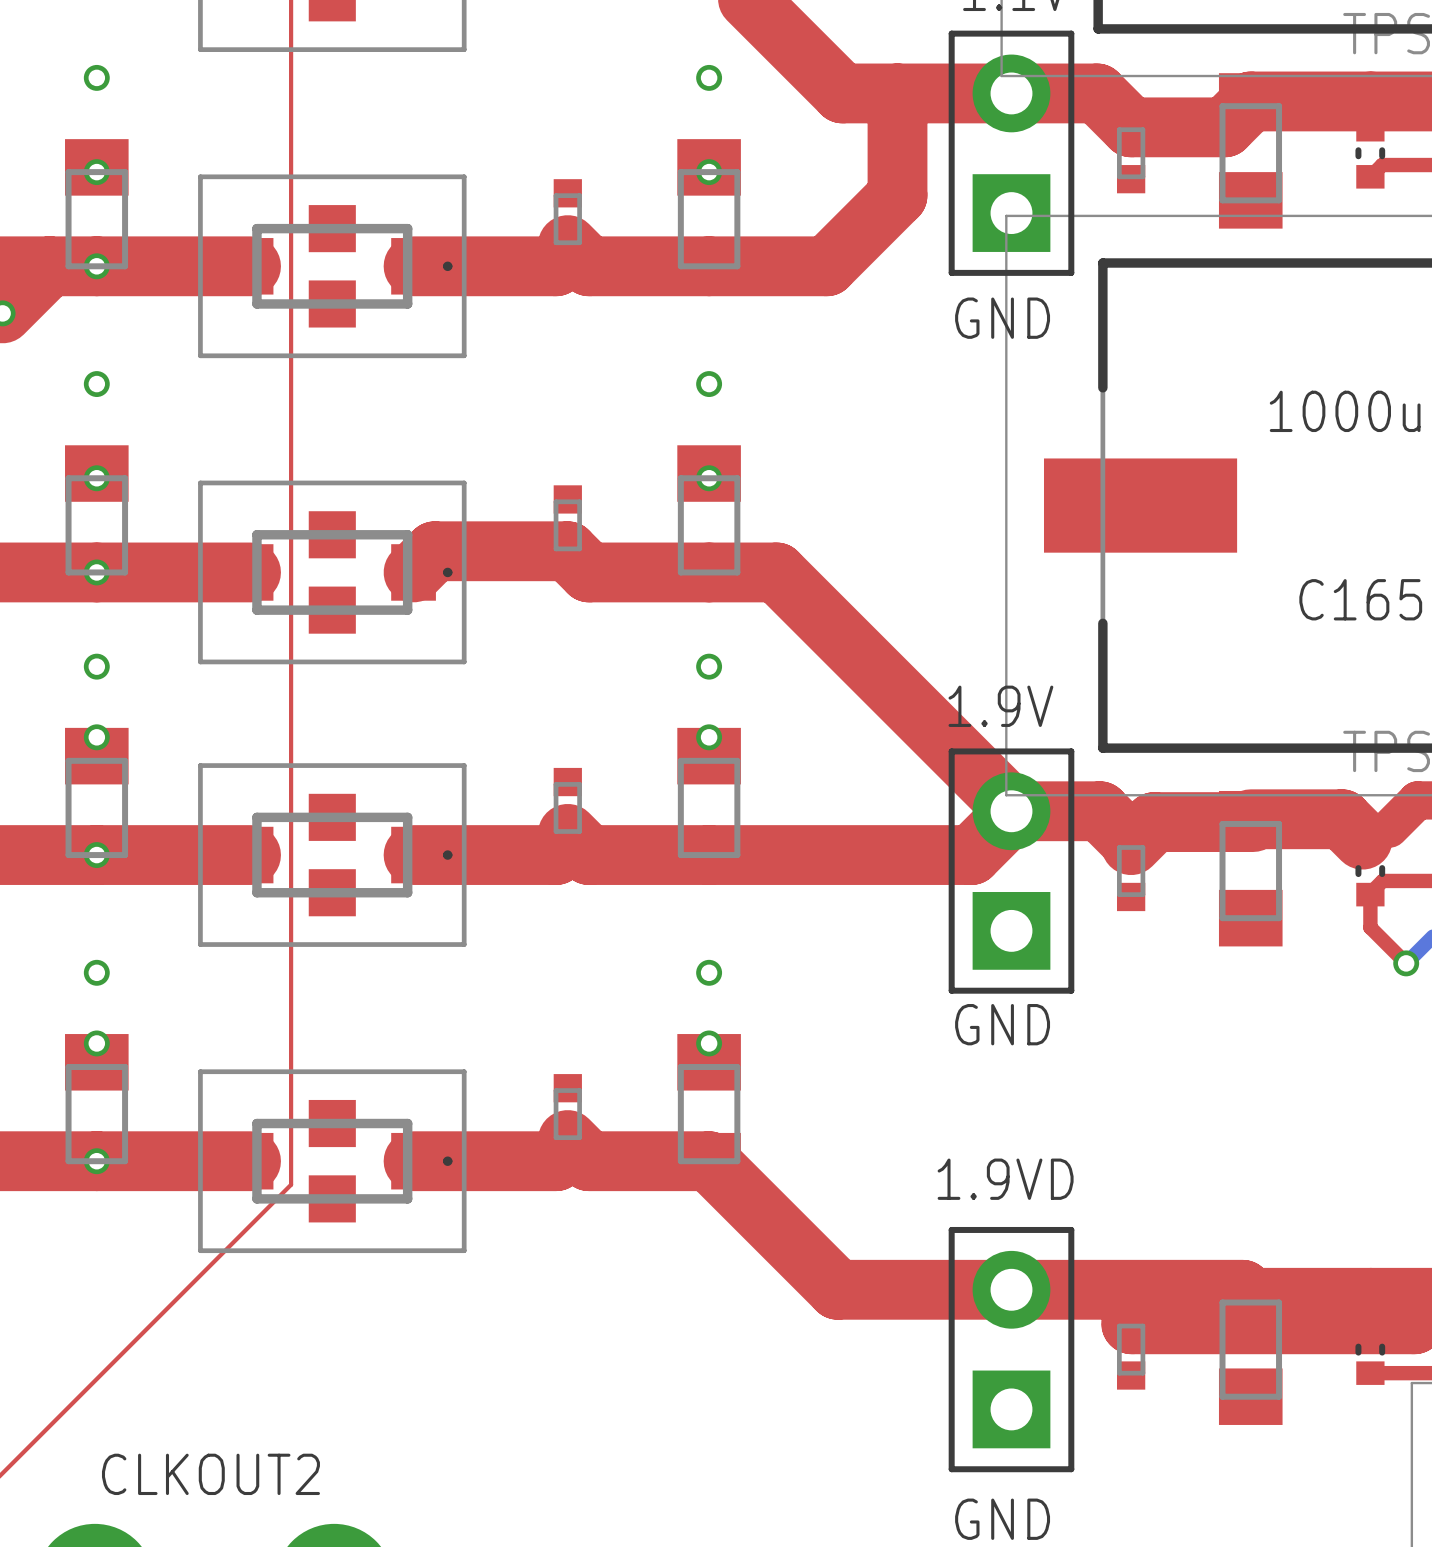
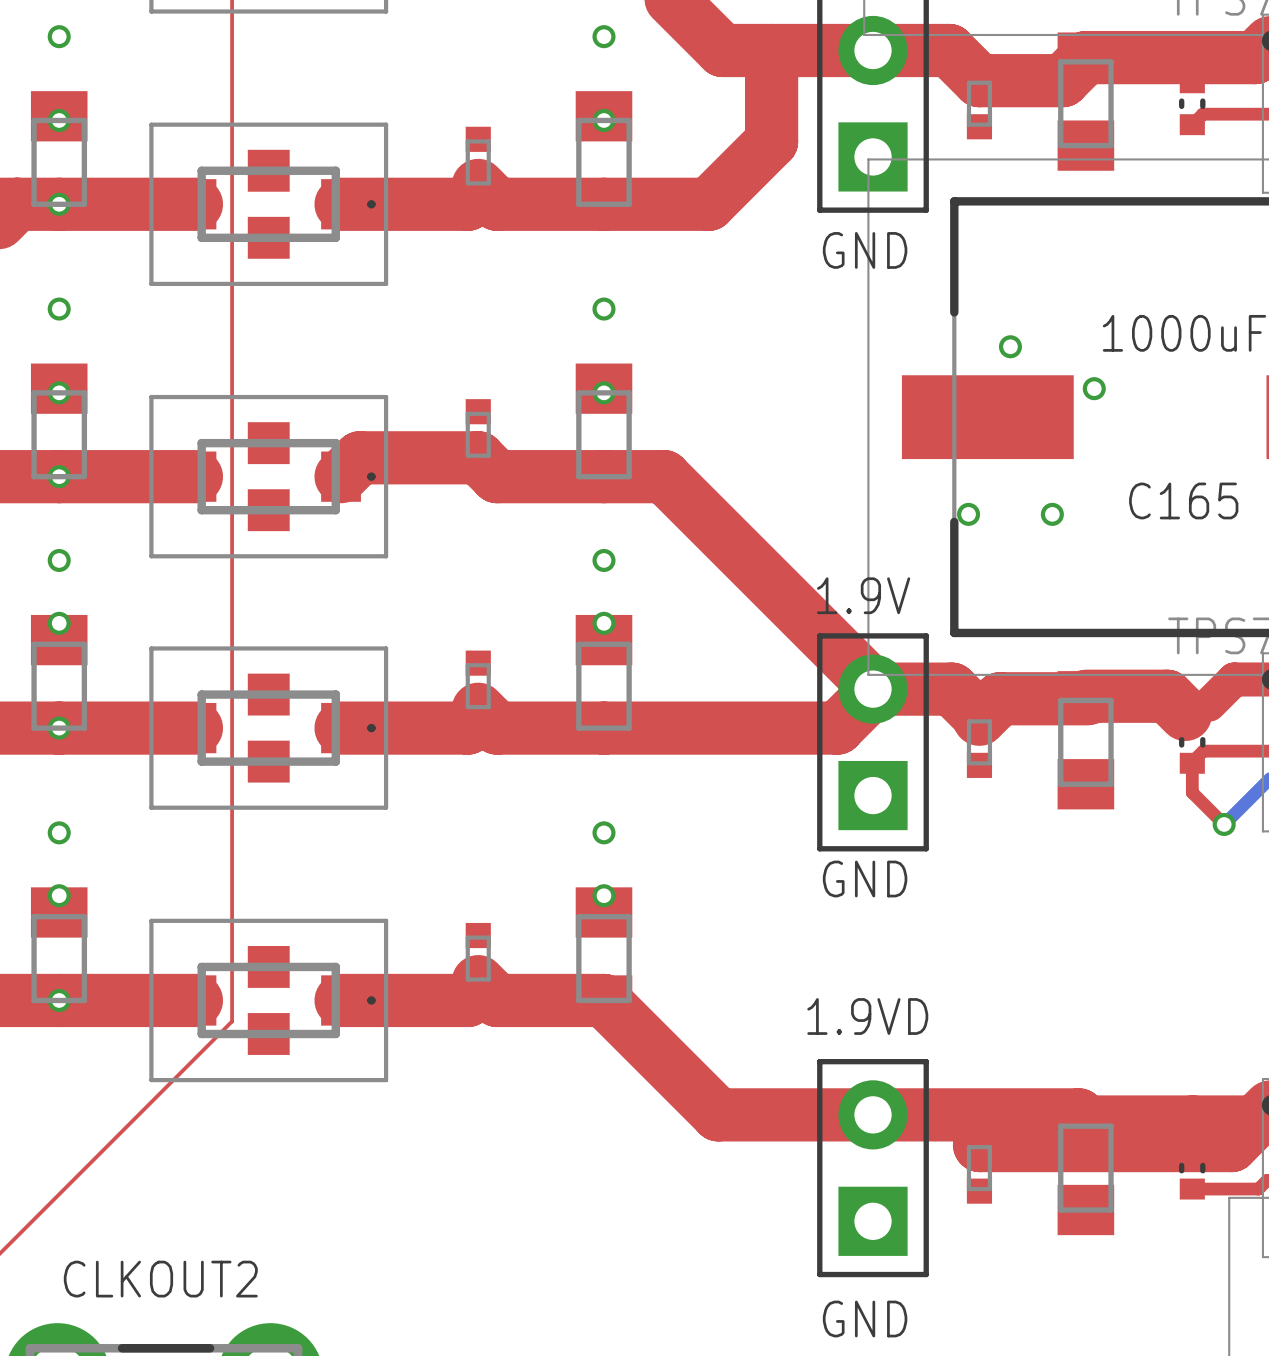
via: none -> (1010, 346)
via: none -> (1094, 388)
via: none -> (968, 514)
via: none -> (1052, 514)

